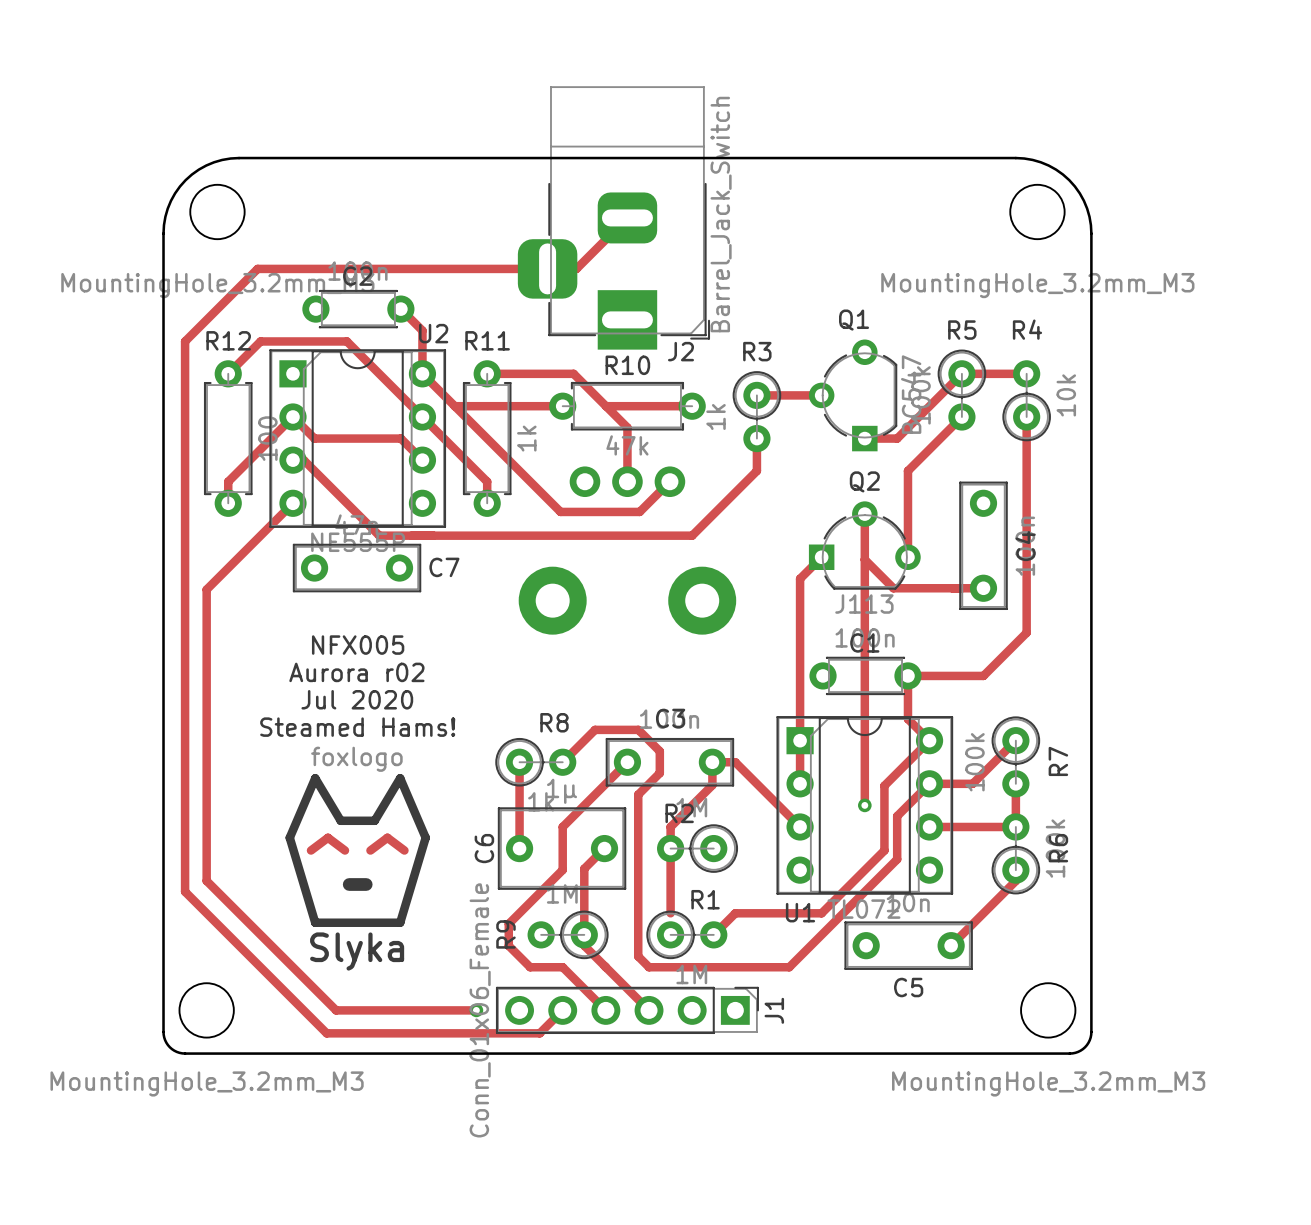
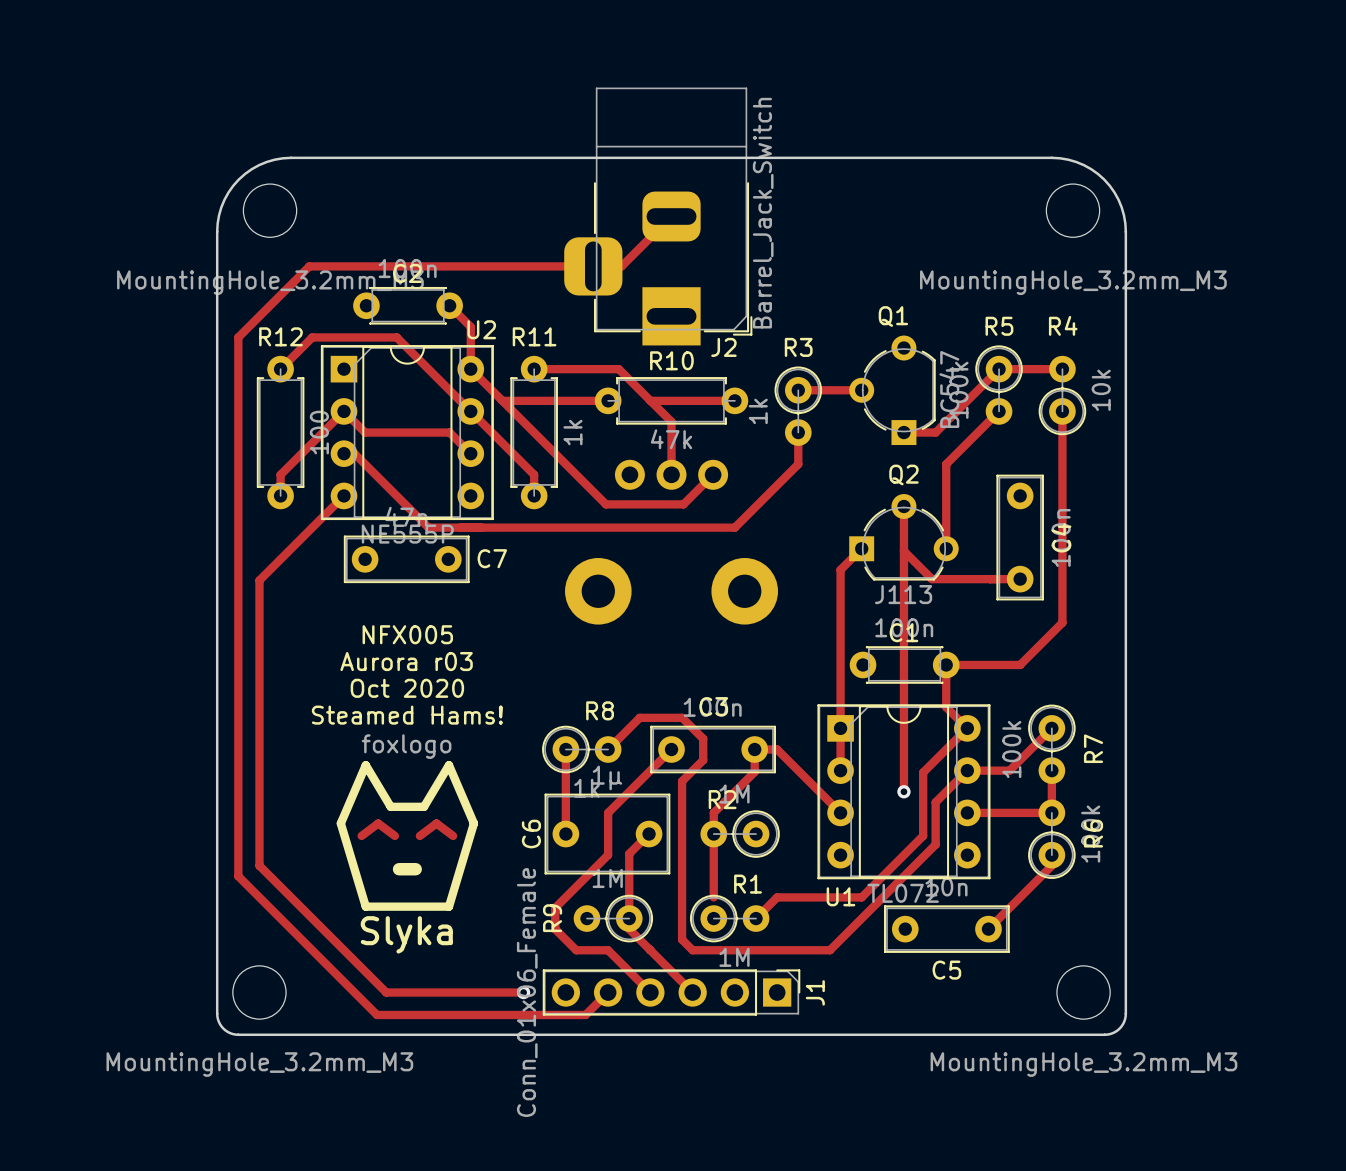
text: Aurora r02 (356, 672) -> Aurora r03 (406, 661)
text: Jul 2020 (357, 699) -> Oct 2020 (407, 688)

